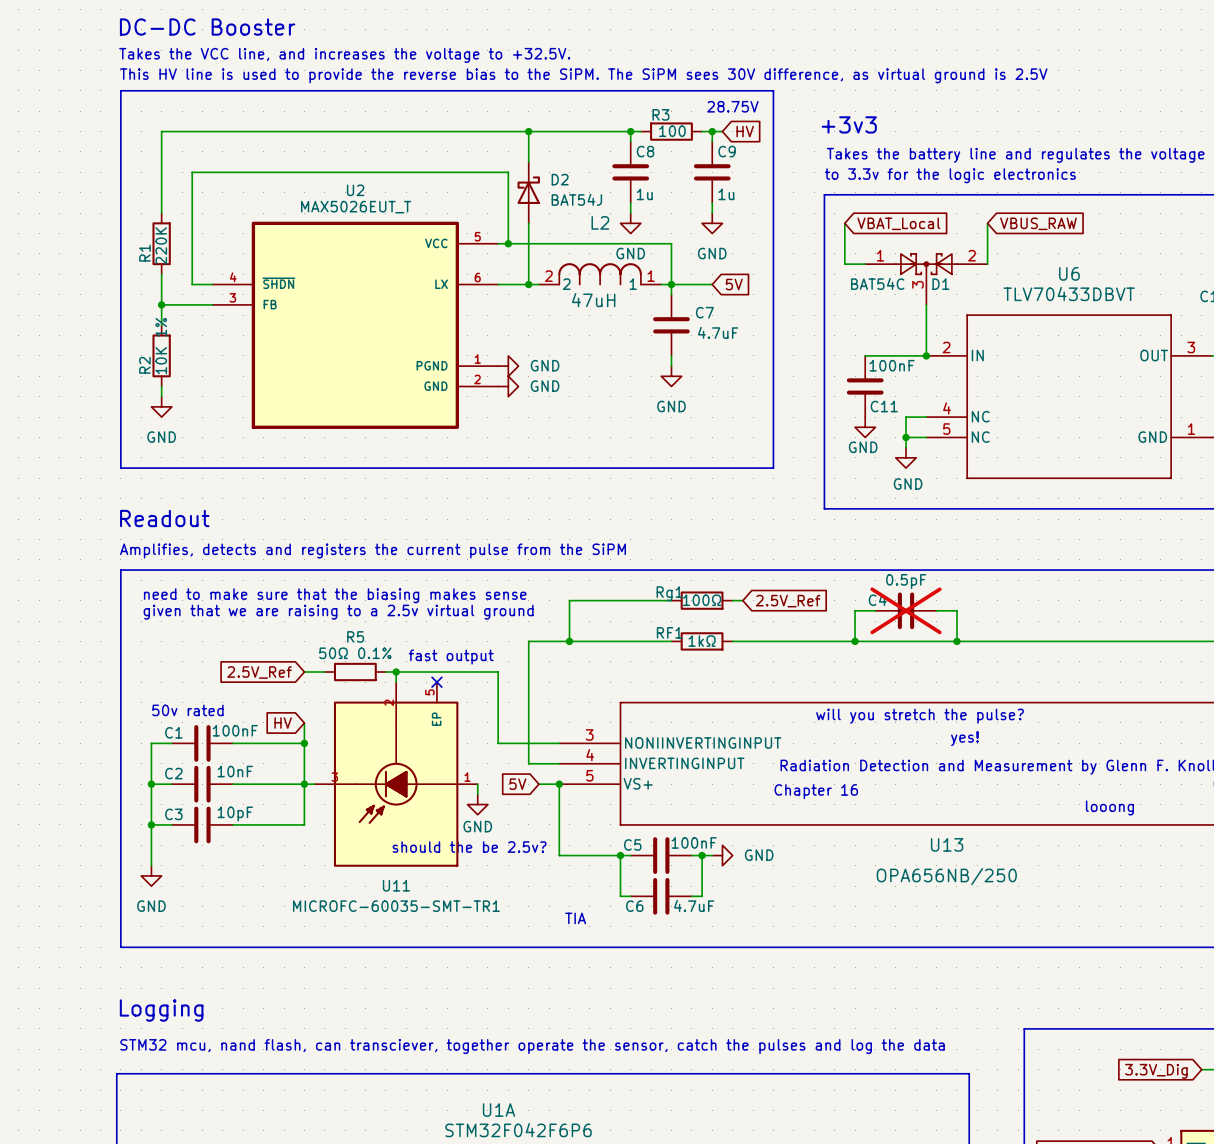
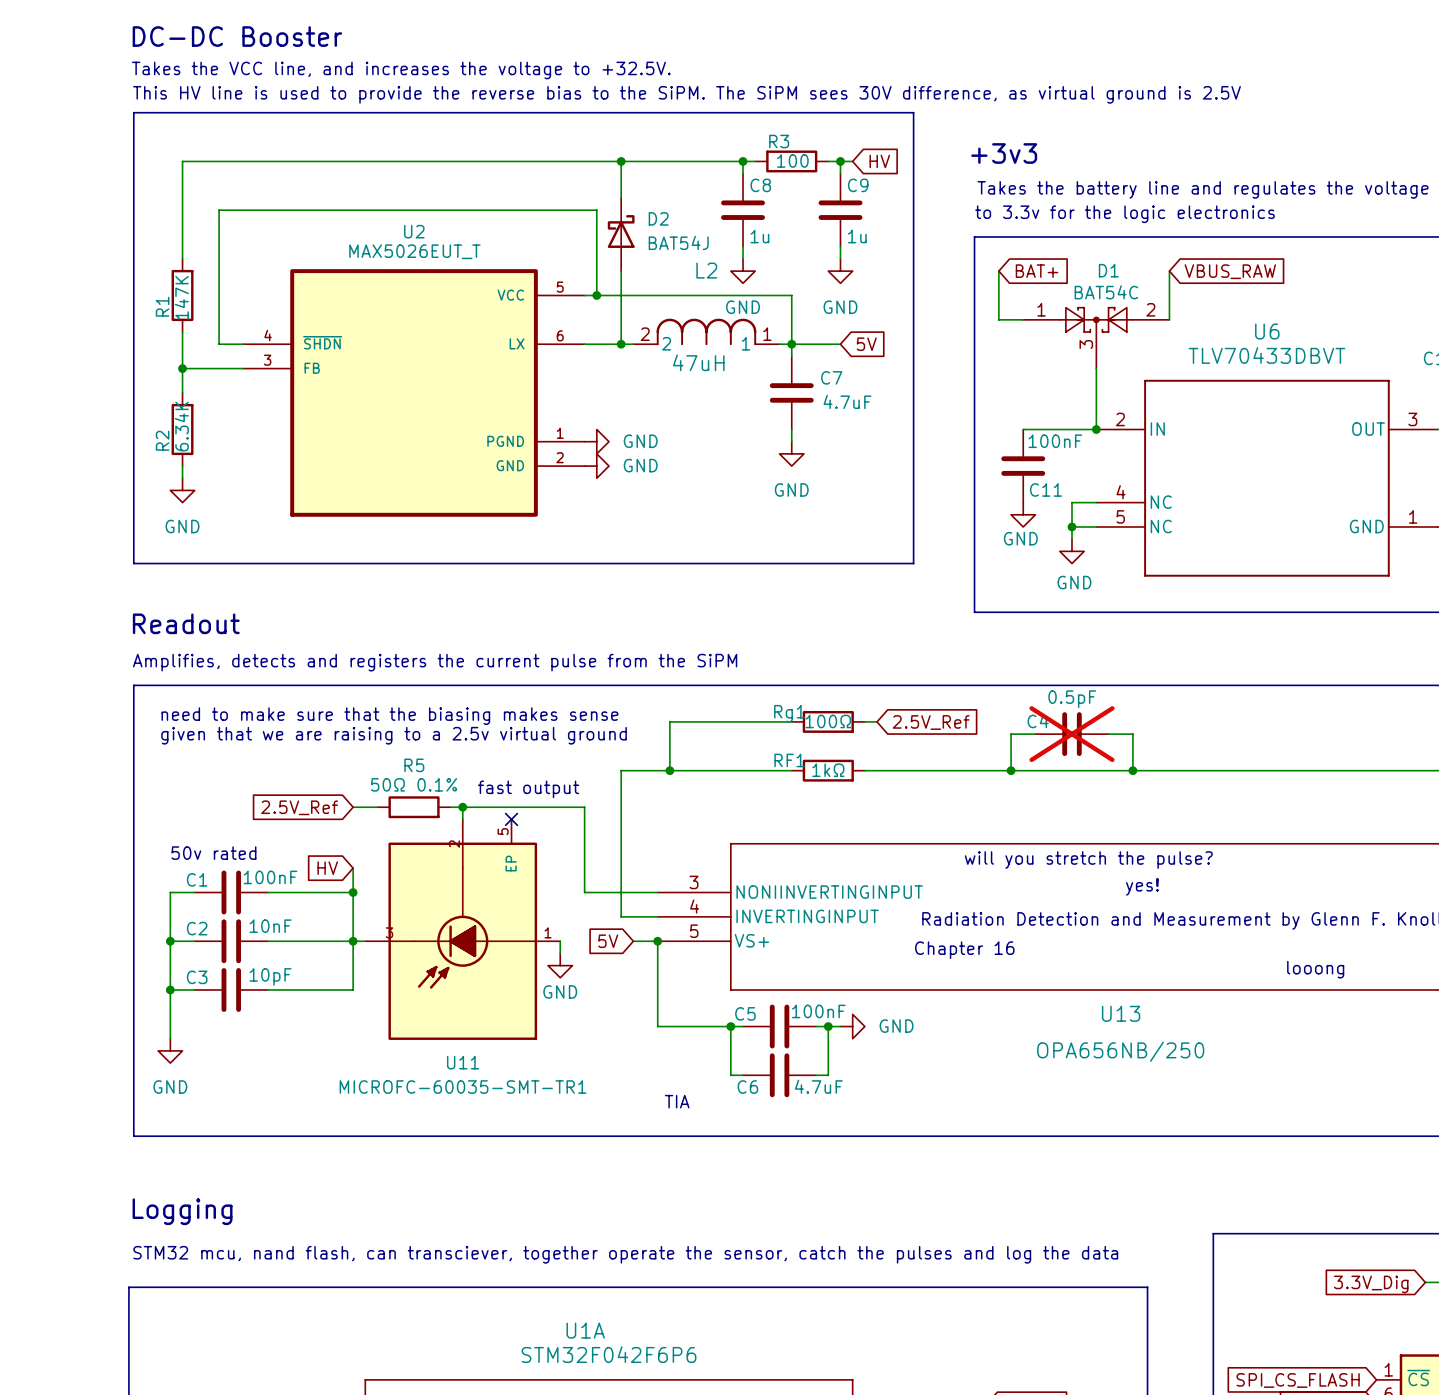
text: 28.75V (732, 106) -> none
global label: VBAT_Local (898, 223) -> BAT+ (1037, 271)
R1 value: 220K (161, 245) -> 147K (181, 297)
D1 value position: BAT54C (877, 283) -> BAT54C (1106, 292)
D1 name position: D1 (940, 284) -> D1 (1108, 270)
R2 value: 10K 1% (161, 346) -> 6.34K (181, 426)
text: should the be 2.5v? (469, 847) -> none

